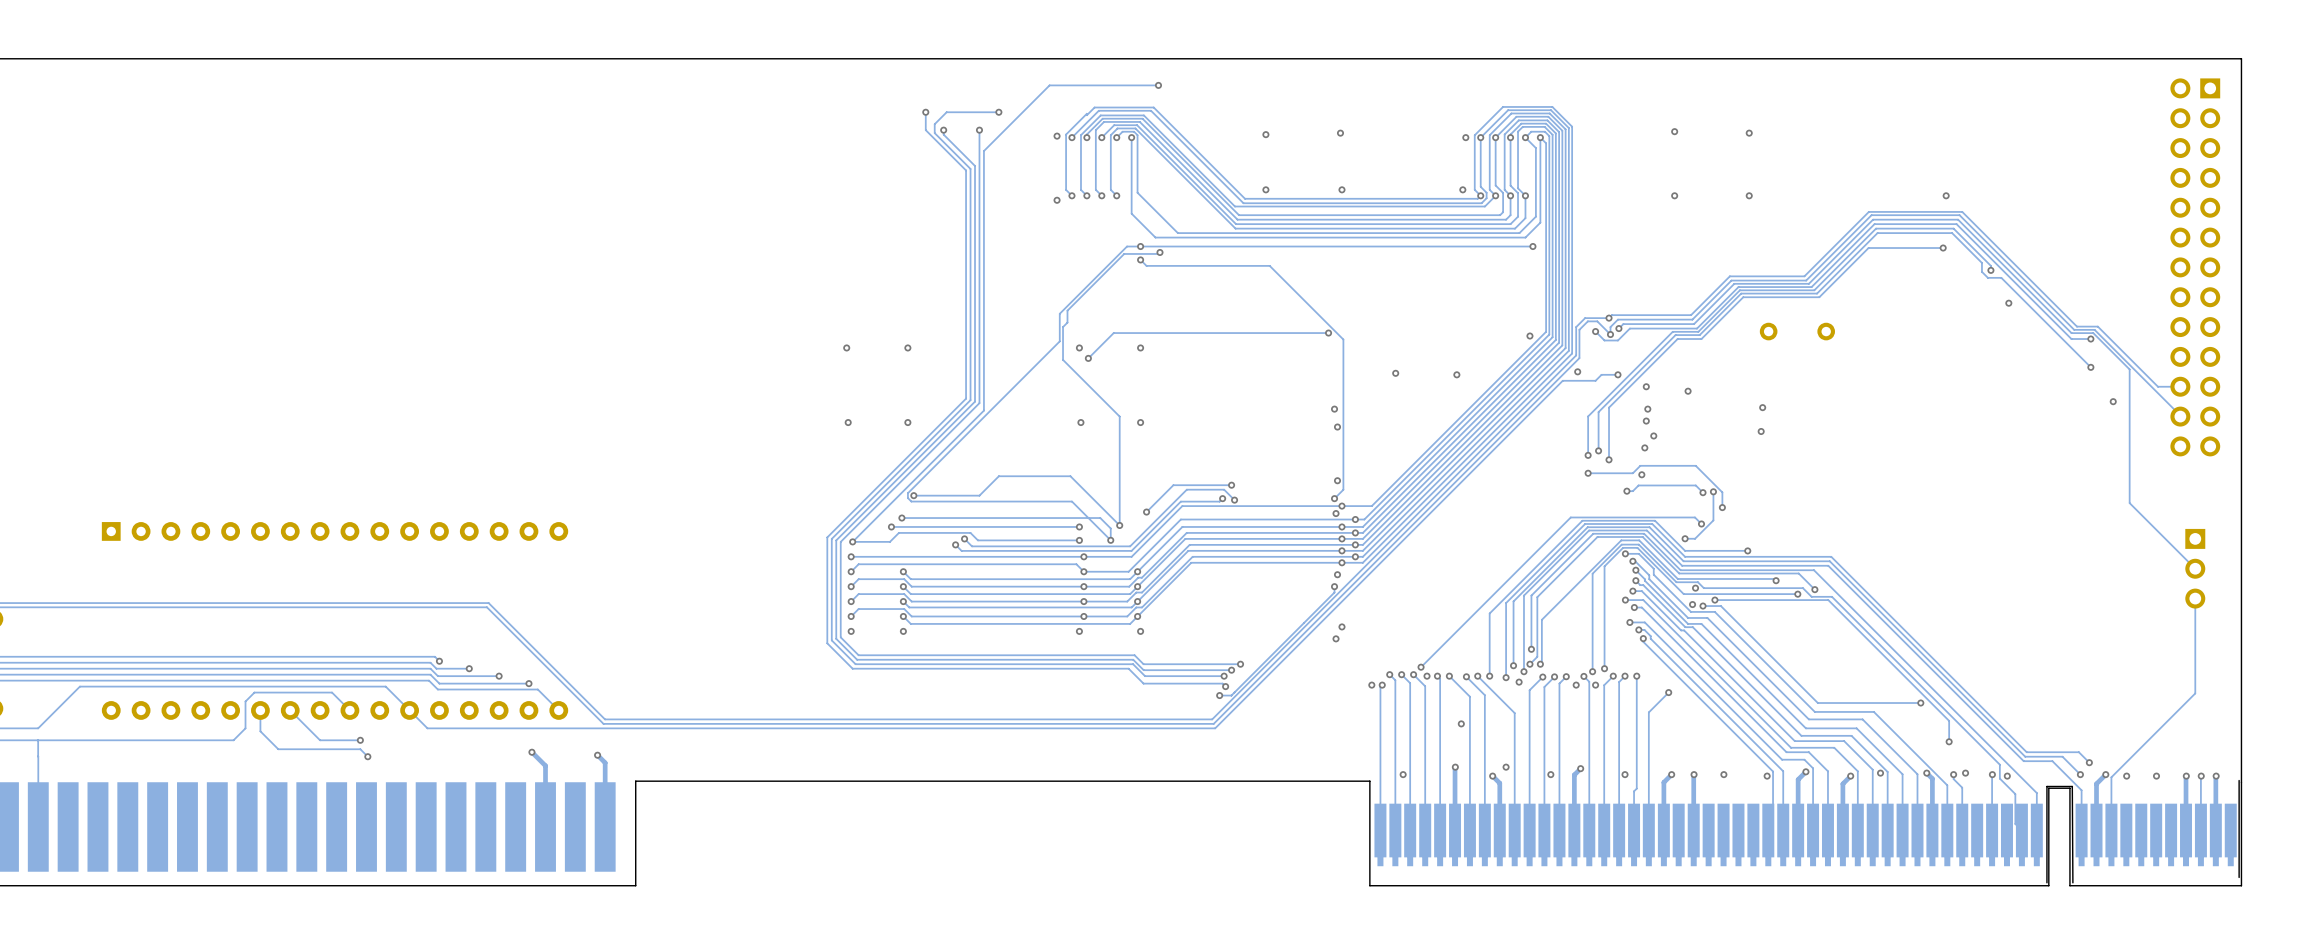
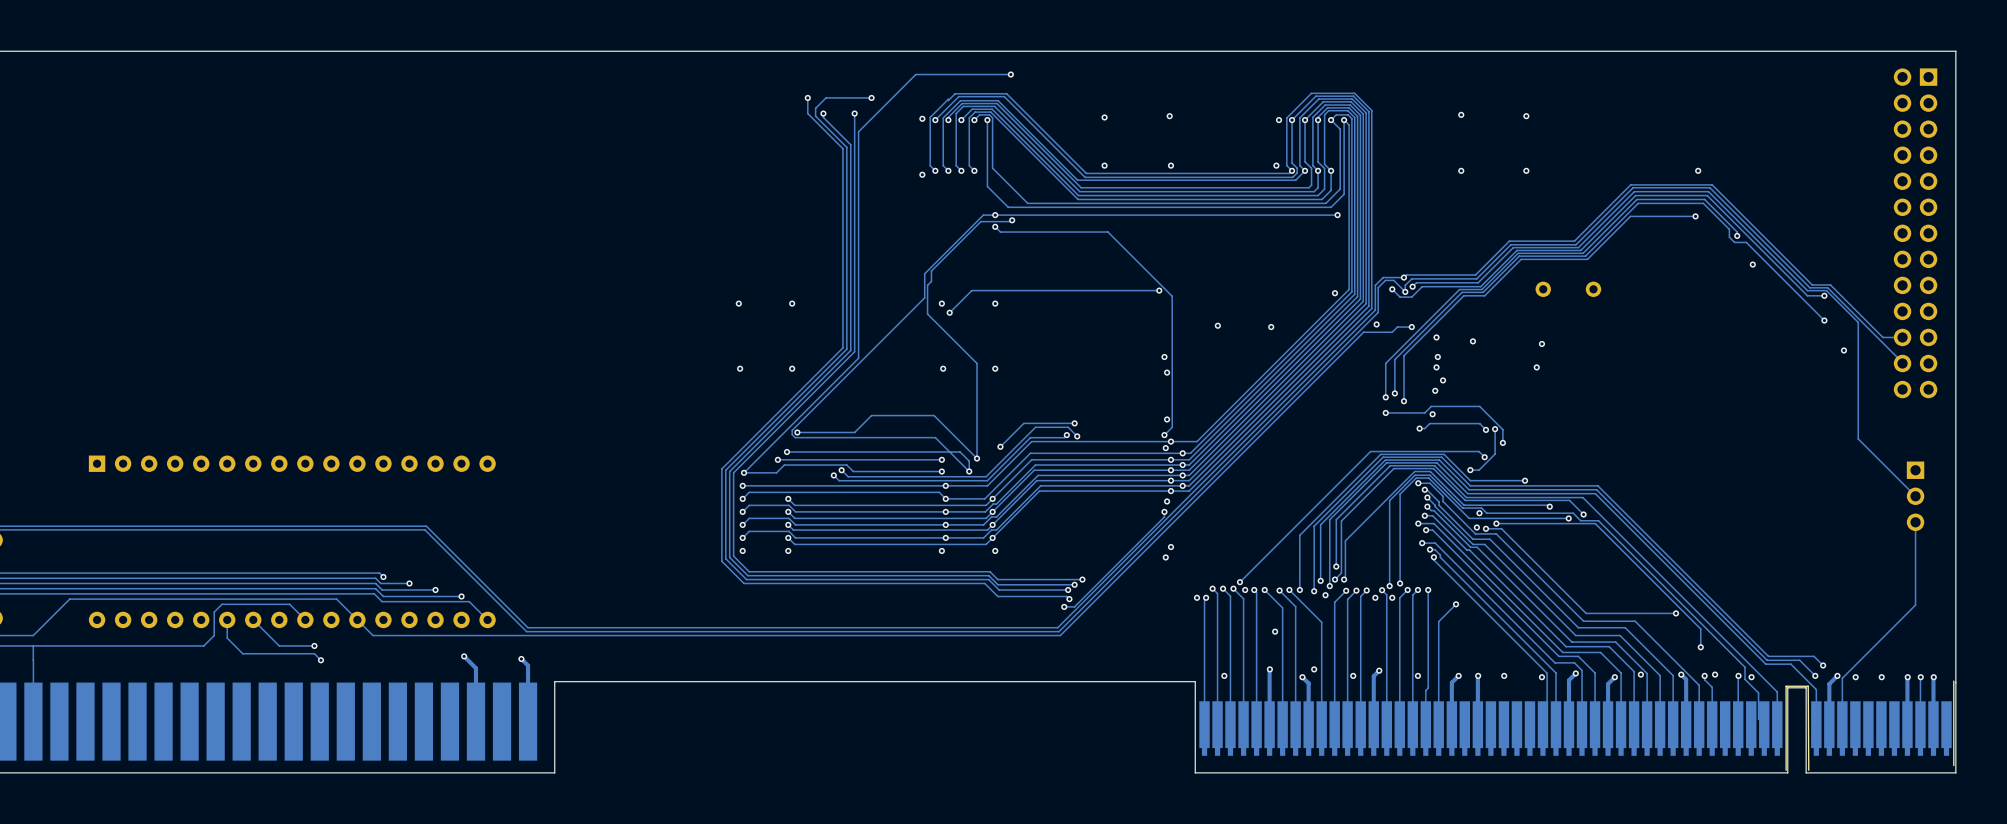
via: none -> (1541, 343)
via: (1762, 407) -> none
via: none -> (1536, 367)
via: (1761, 431) -> none

